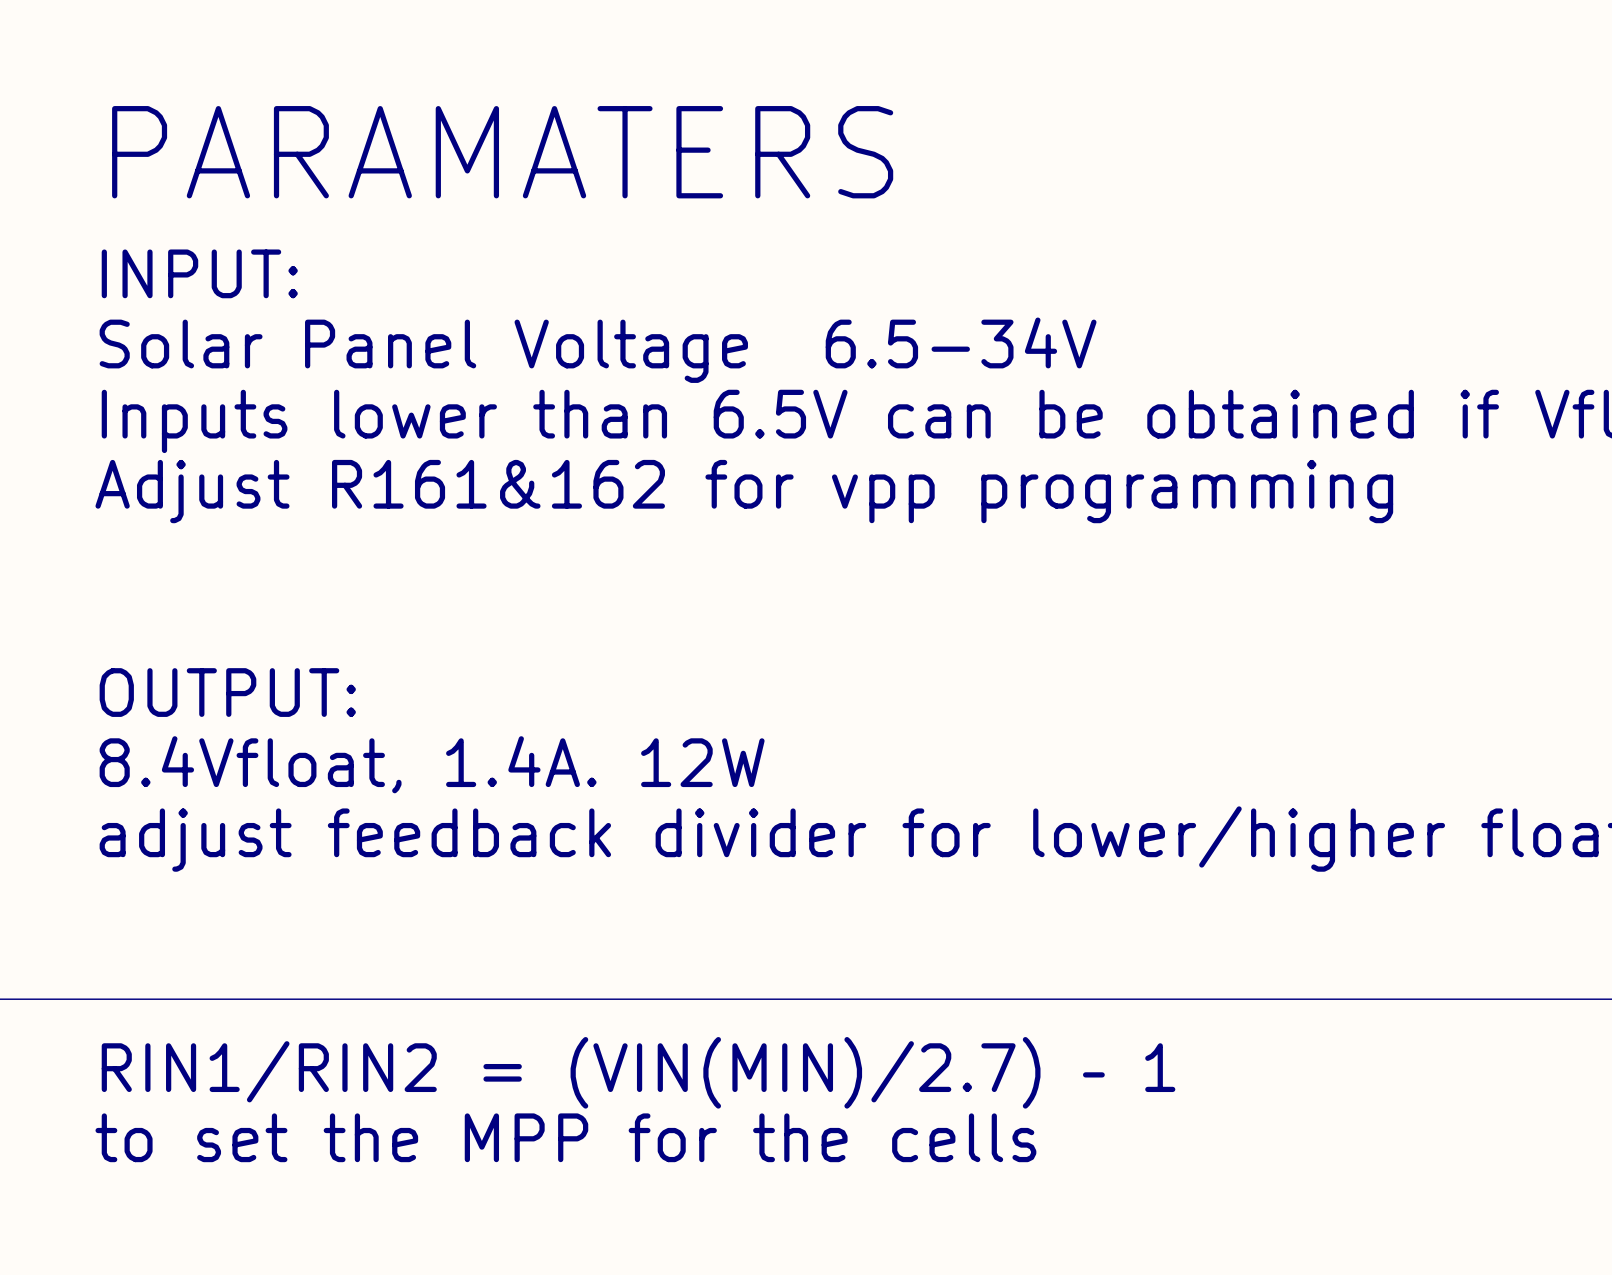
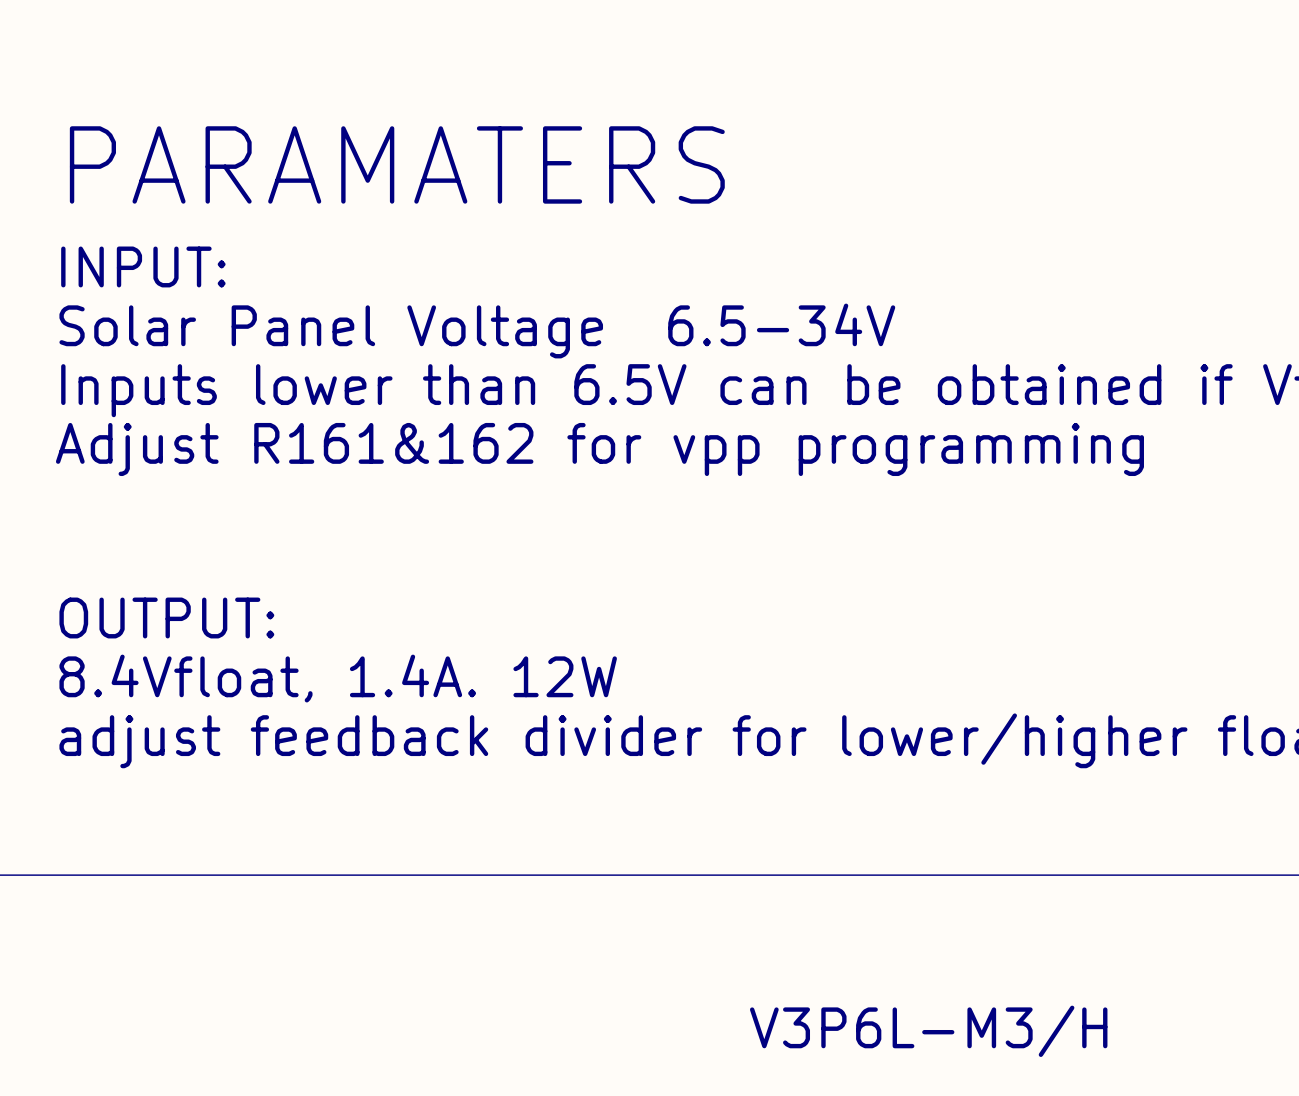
text: RIN1/RIN2 = (VIN(MIN)/2.7) – 1 (638, 1072) -> none
text: to set the MPP for the cells (565, 1137) -> none
text: none -> V3P6L-M3/H (928, 1031)

